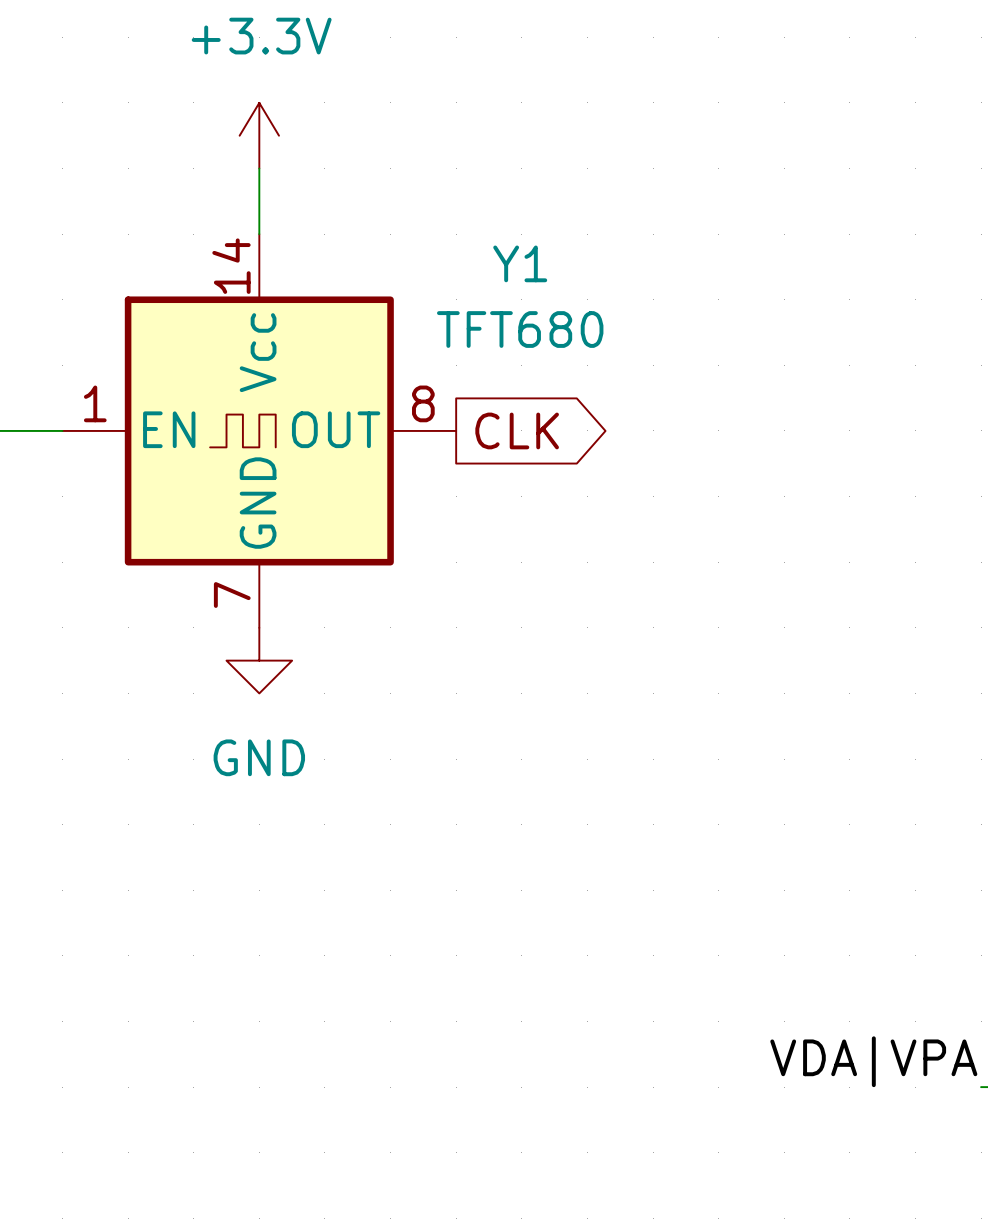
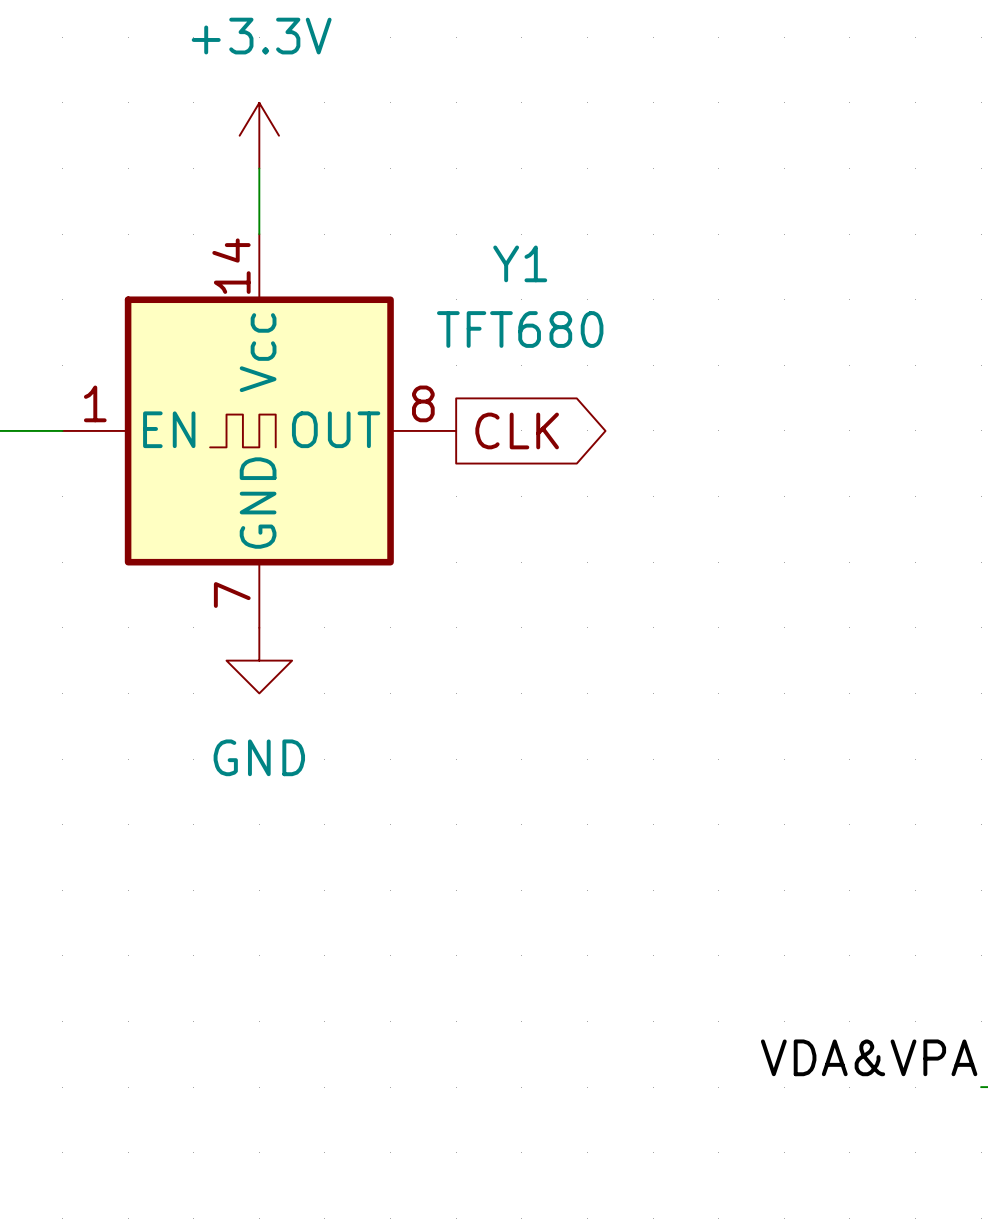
label: VDA|VPA (873, 1061) -> VDA&VPA (869, 1057)

